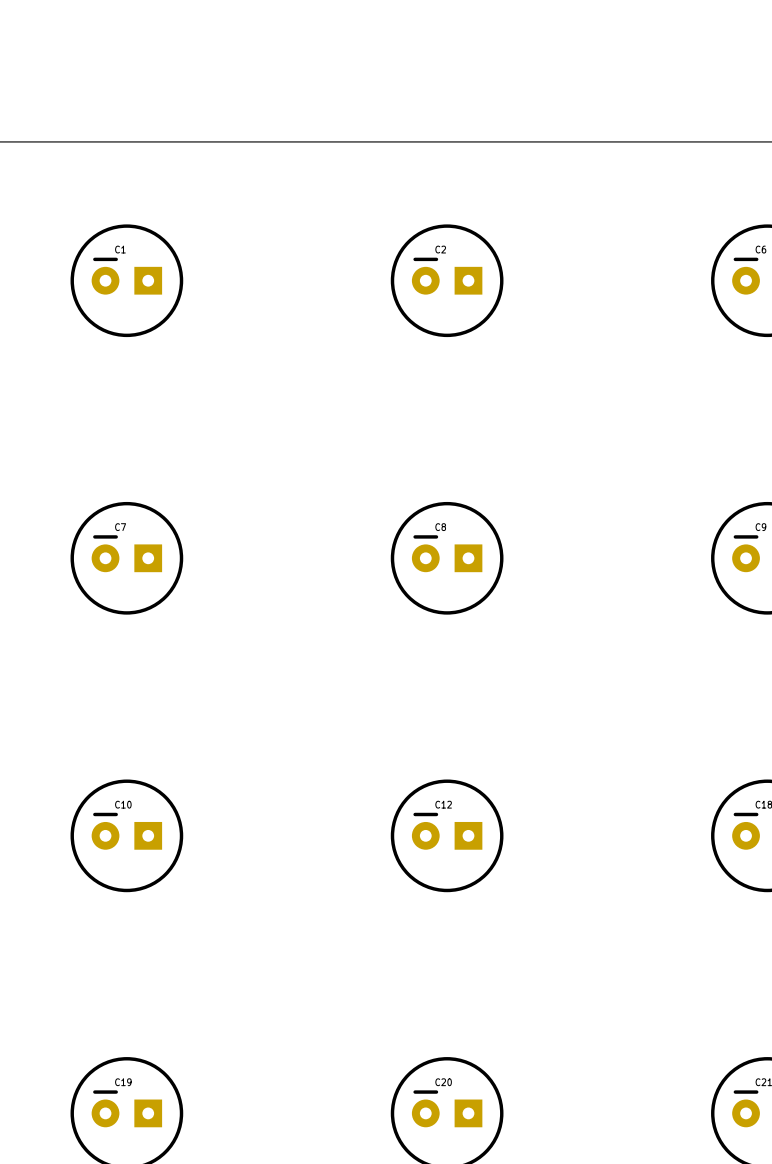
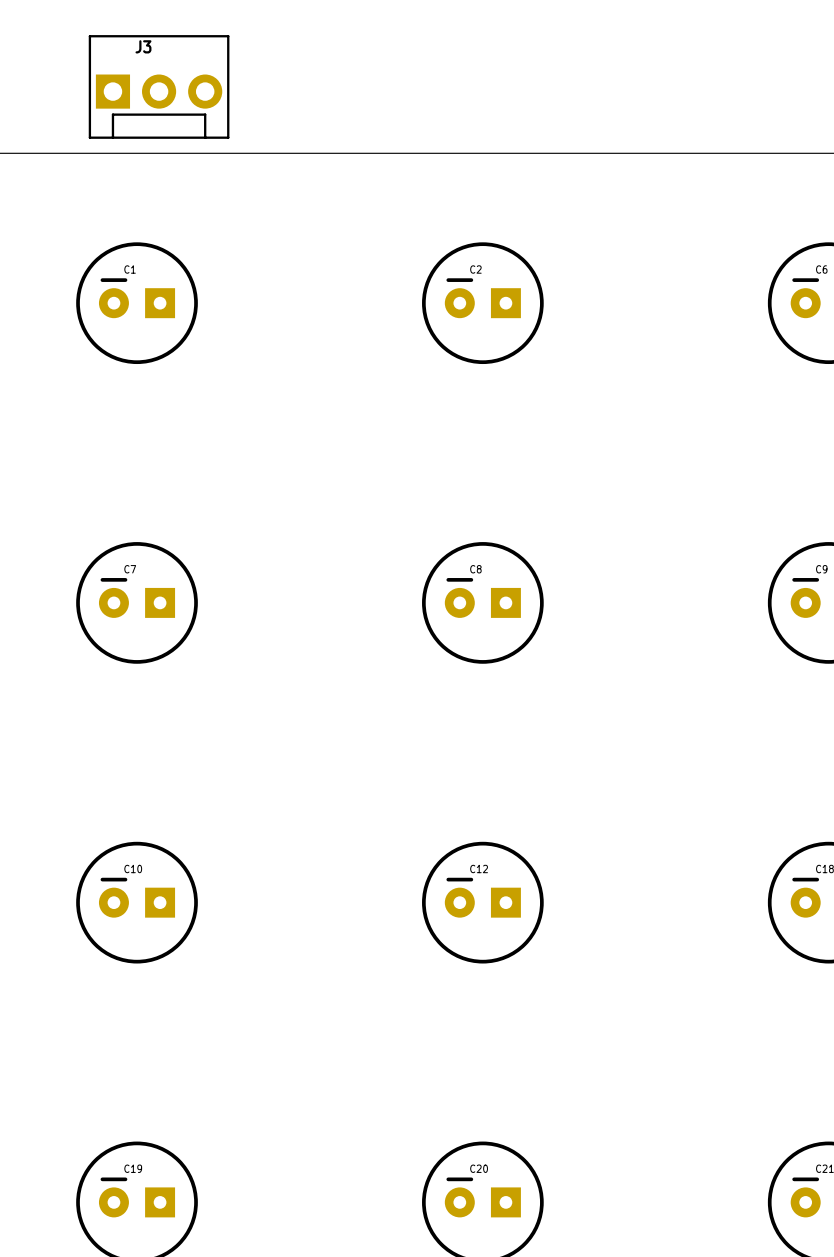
J3: none -> (159, 86)

